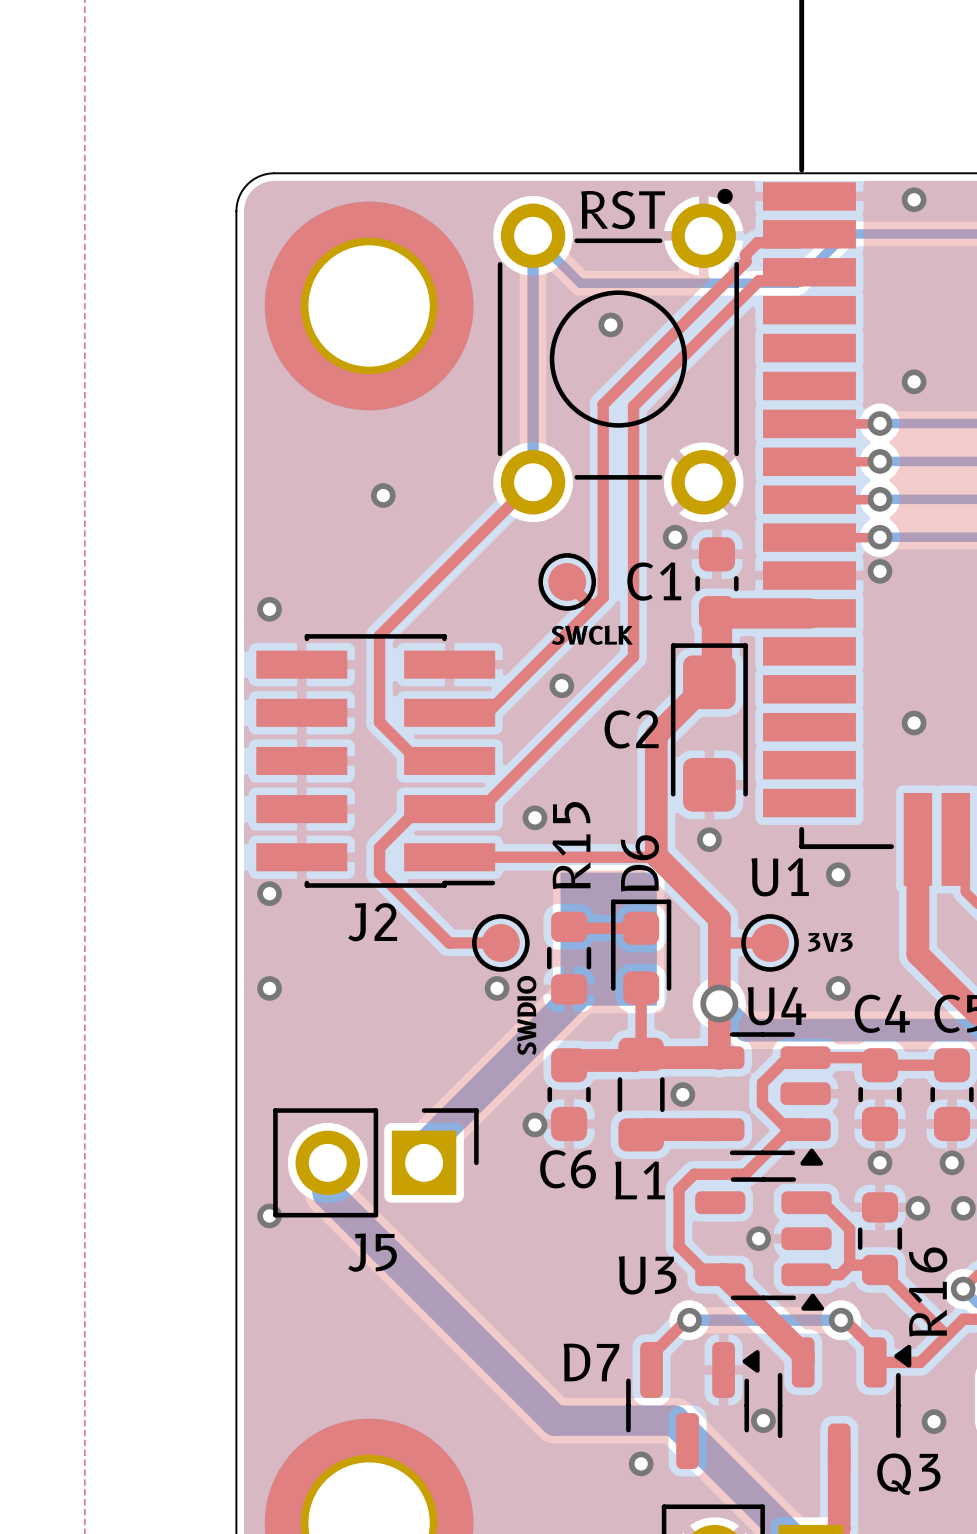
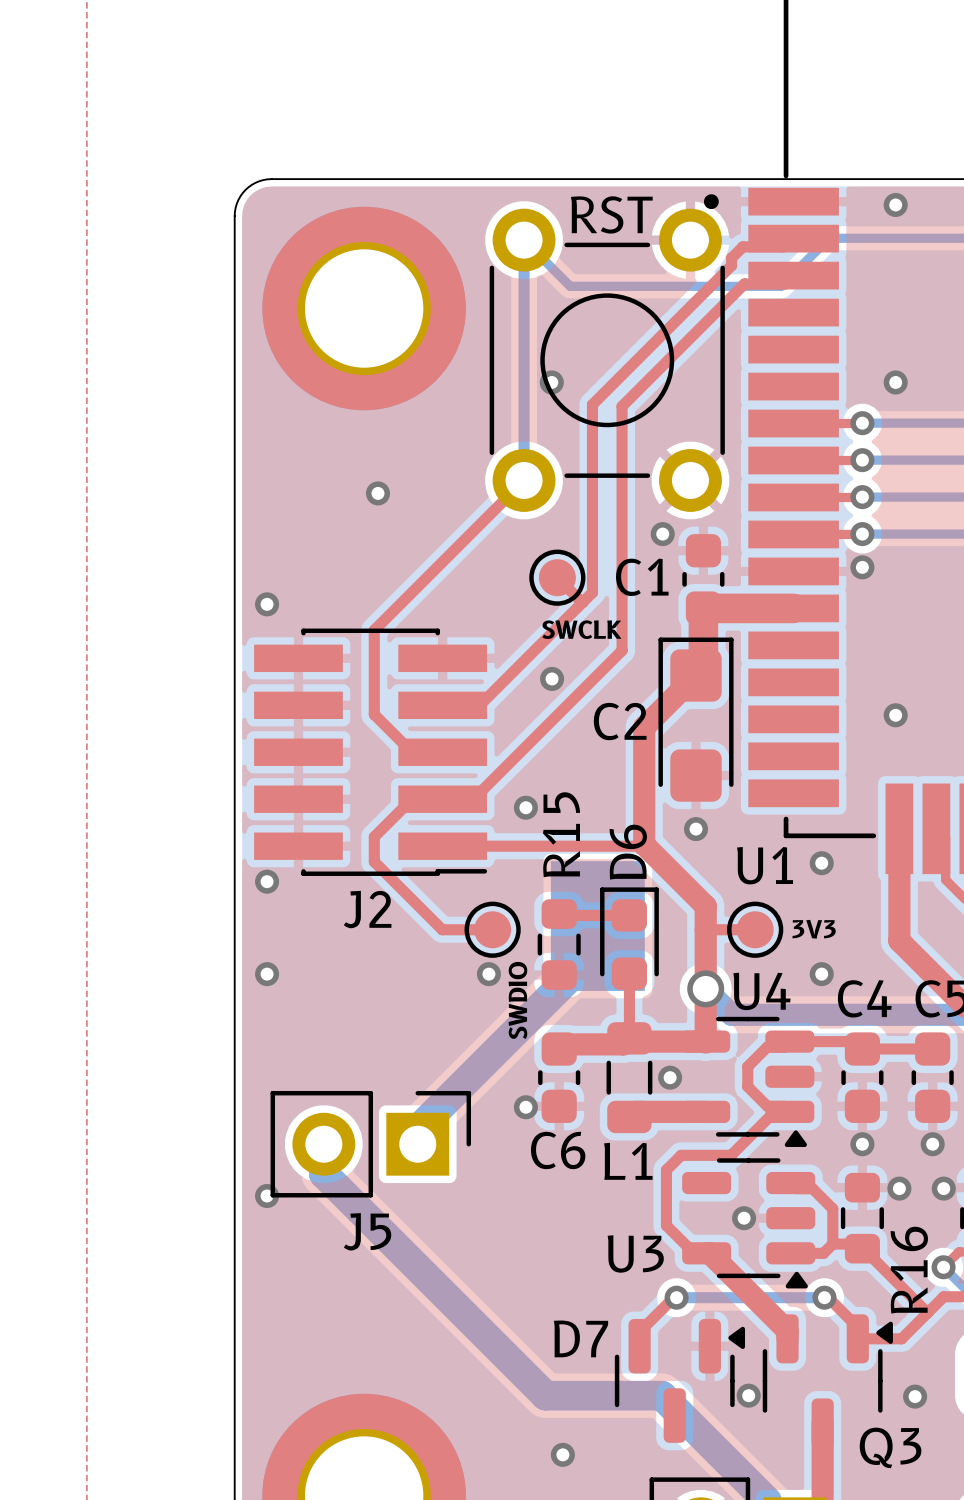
via position: (610, 324) -> (551, 382)
via position: (641, 1463) -> (562, 1454)

